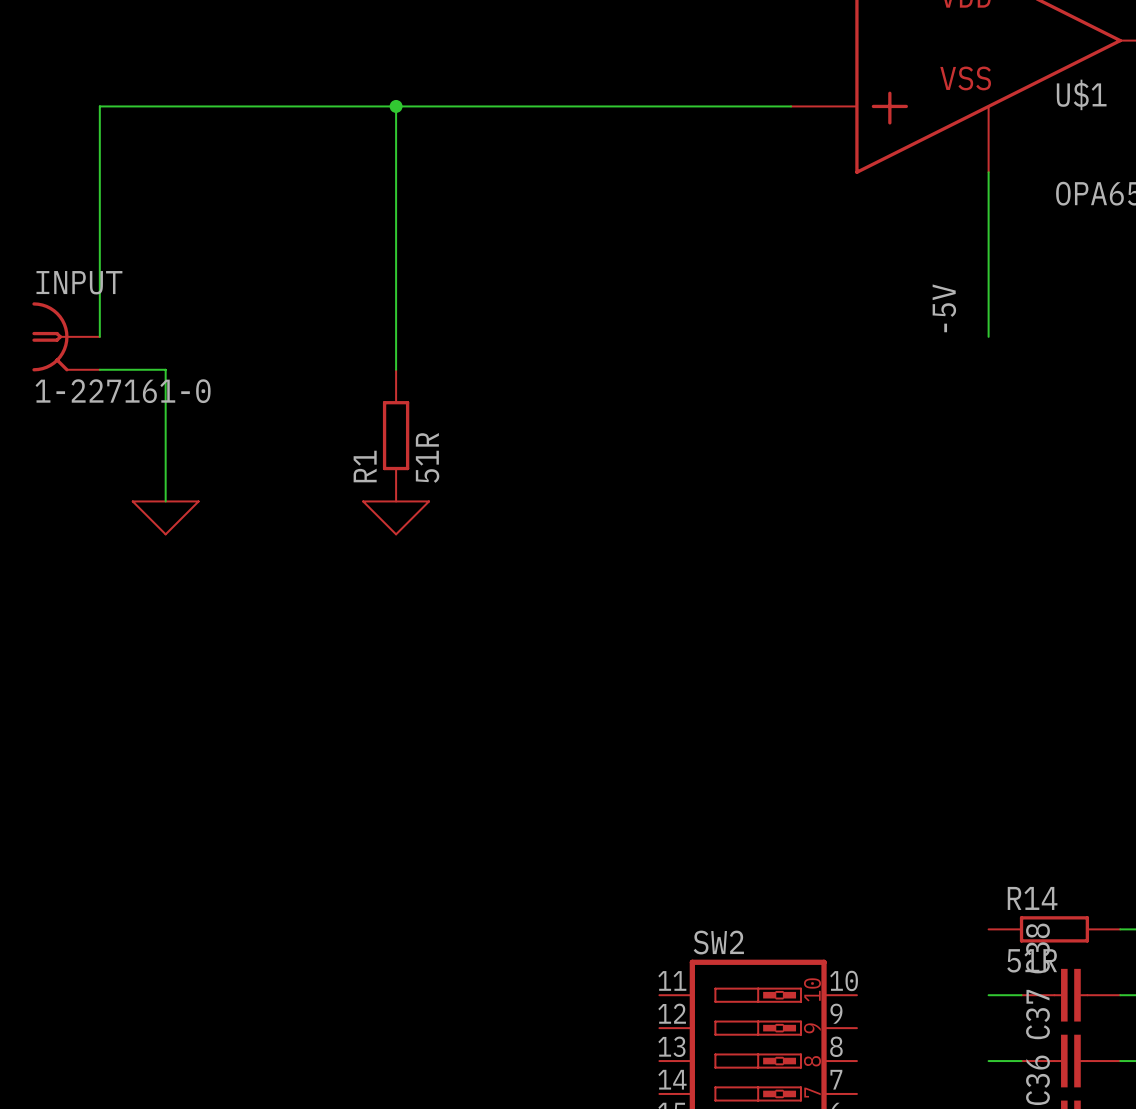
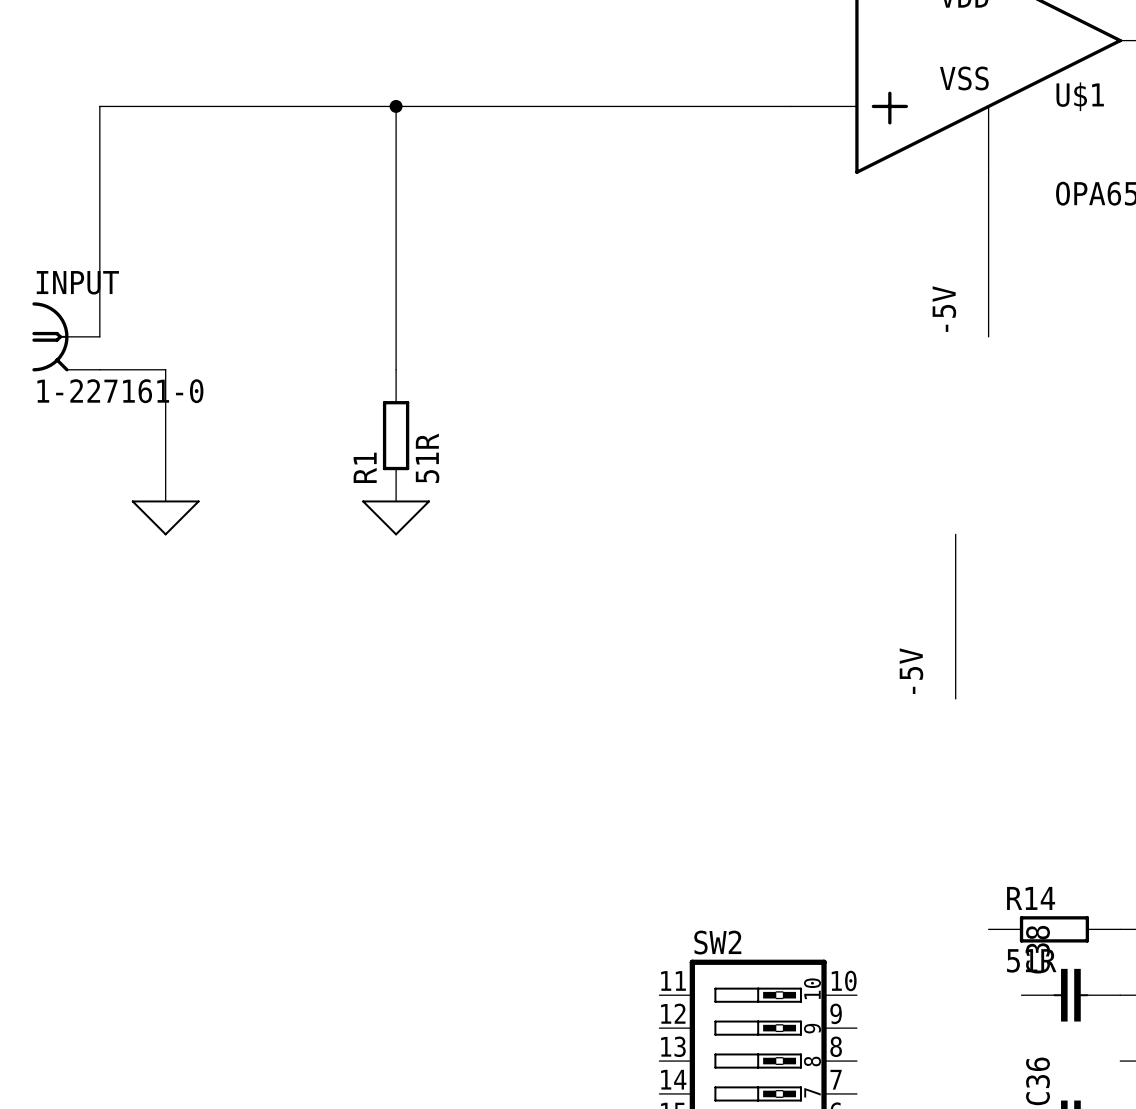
wire: none -> (955, 534) (955, 698)
label: none -> -5V (911, 671)
wire: (988, 995) (1021, 995) -> none
wire: (988, 1061) (1021, 1061) -> none
C37: (1070, 1061) -> none

